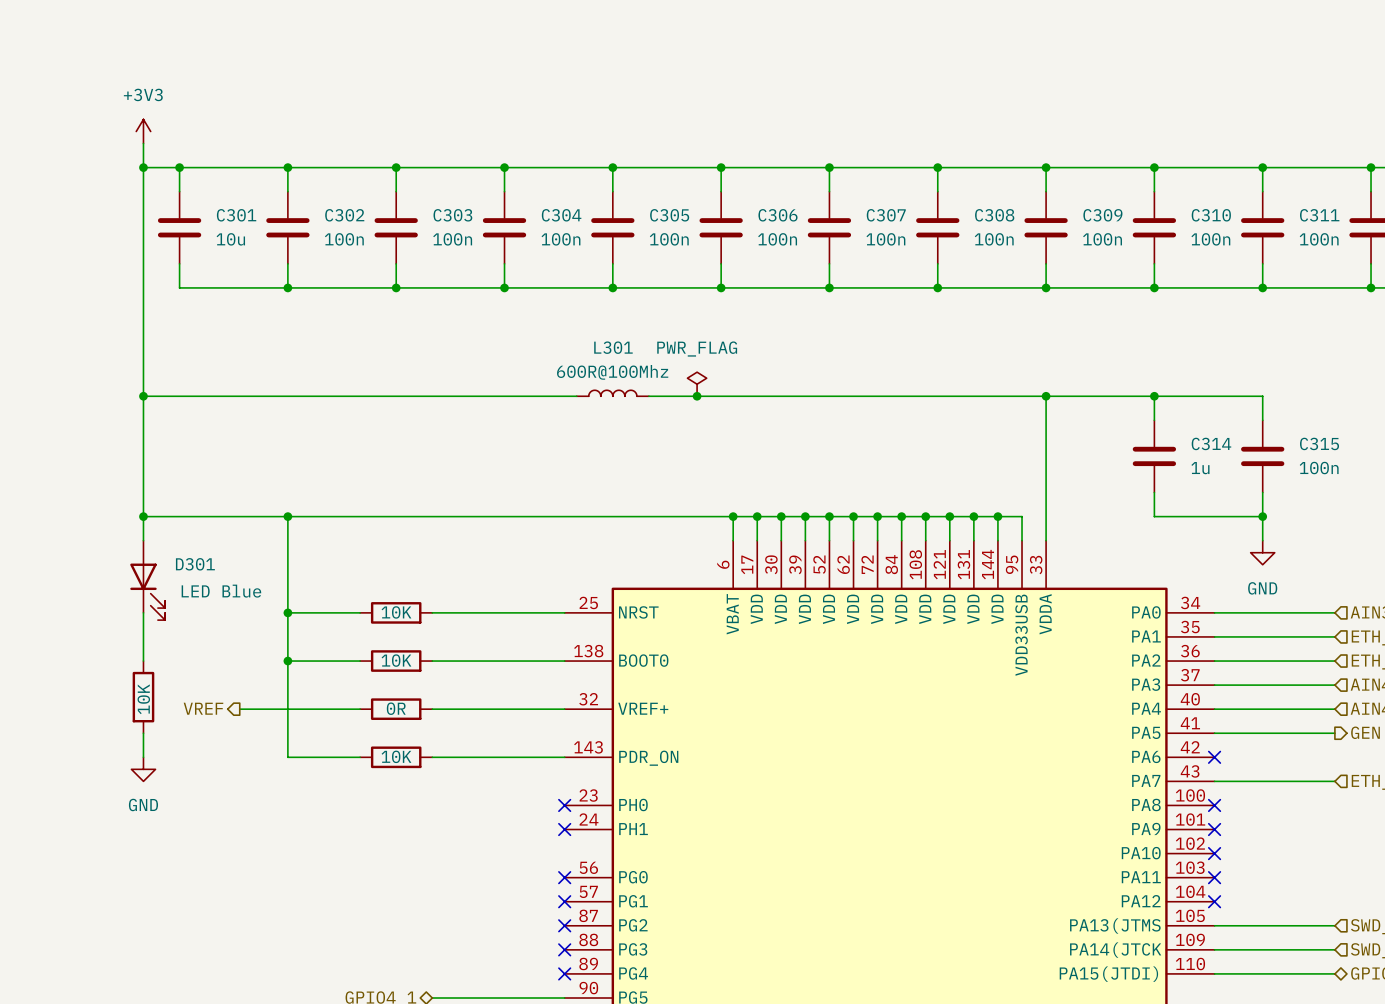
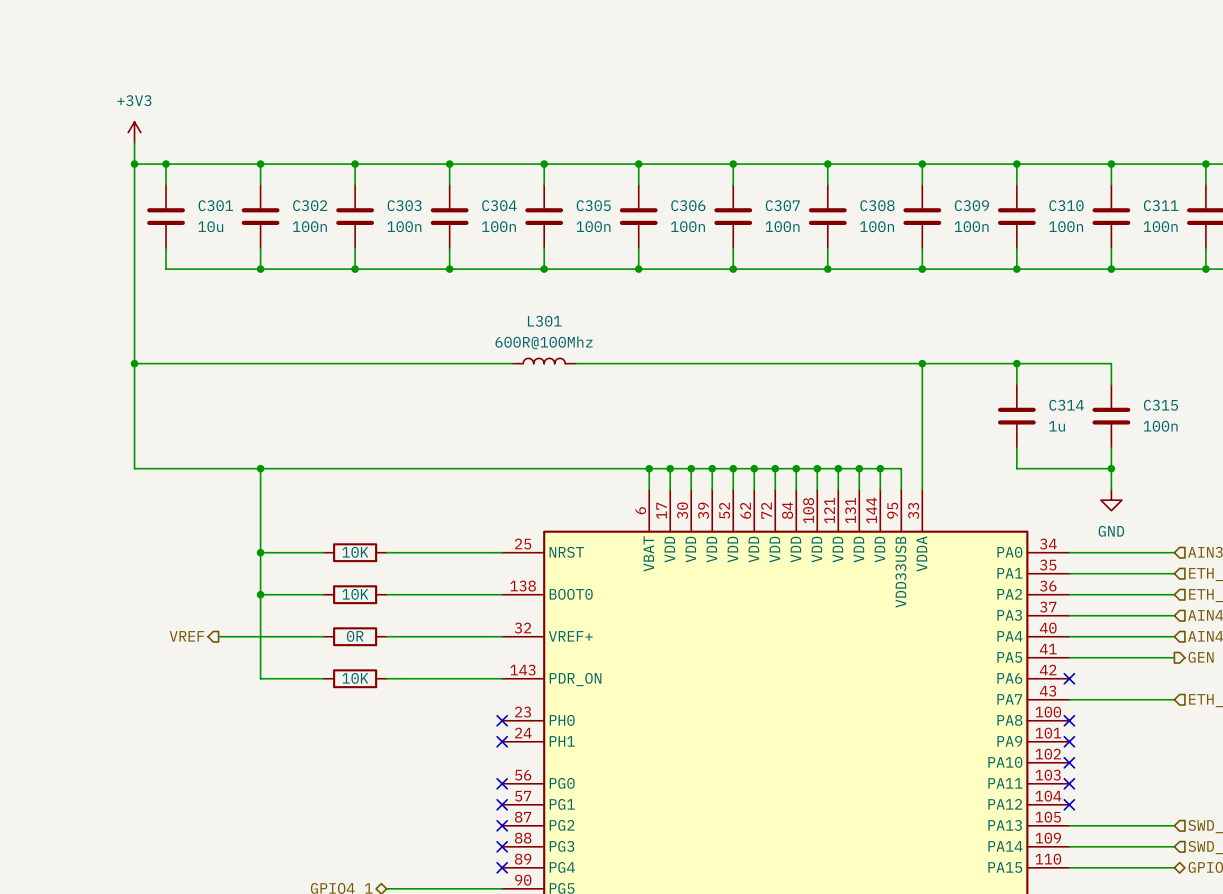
power symbol: PWR_FLAG (697, 384) -> none
junction: (697, 396) -> none
wire: (143, 516) (143, 540) -> none
junction: (143, 516) -> none
D301: LED Blue (147, 580) -> none
wire: (143, 612) (143, 661) -> none
part: 10K (143, 697) -> none
wire: (143, 733) (143, 757) -> none
power symbol: GND (143, 769) -> none
part pin name: PA13(JTMS (1115, 925) -> PA13 (1005, 825)
part pin name: PA14(JTCK (1115, 950) -> PA14 (1005, 846)
part pin name: PA15(JTDI) (1108, 974) -> PA15 (1005, 867)

